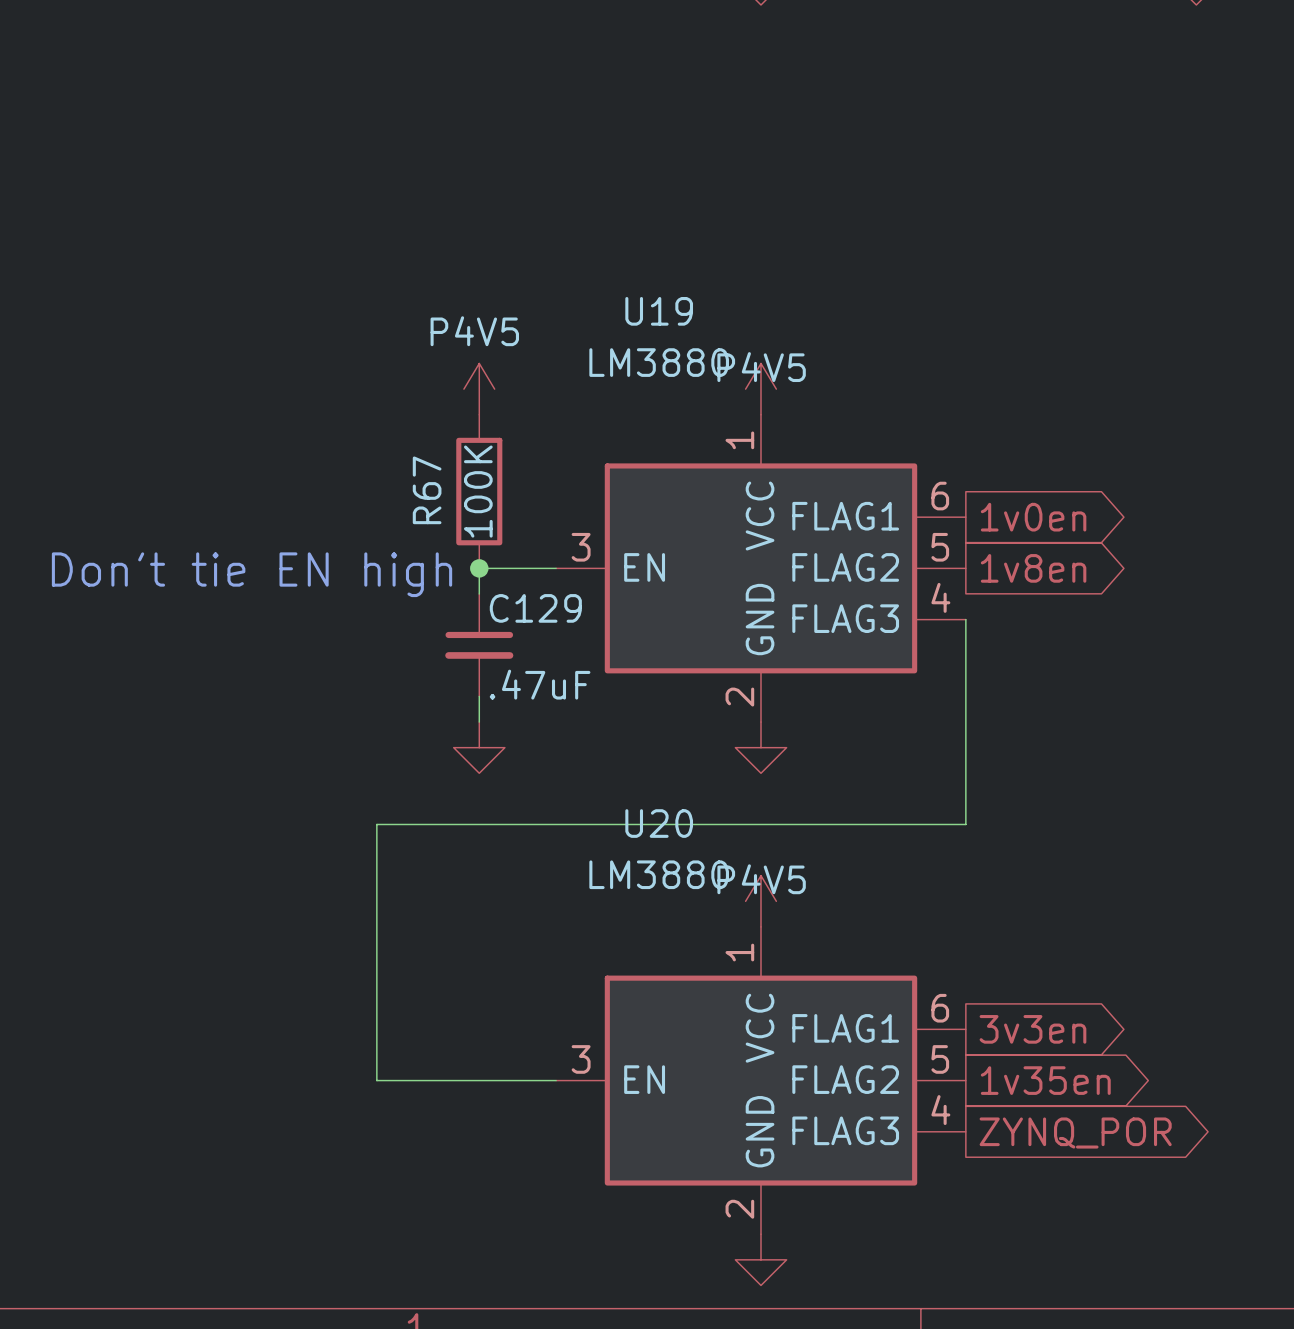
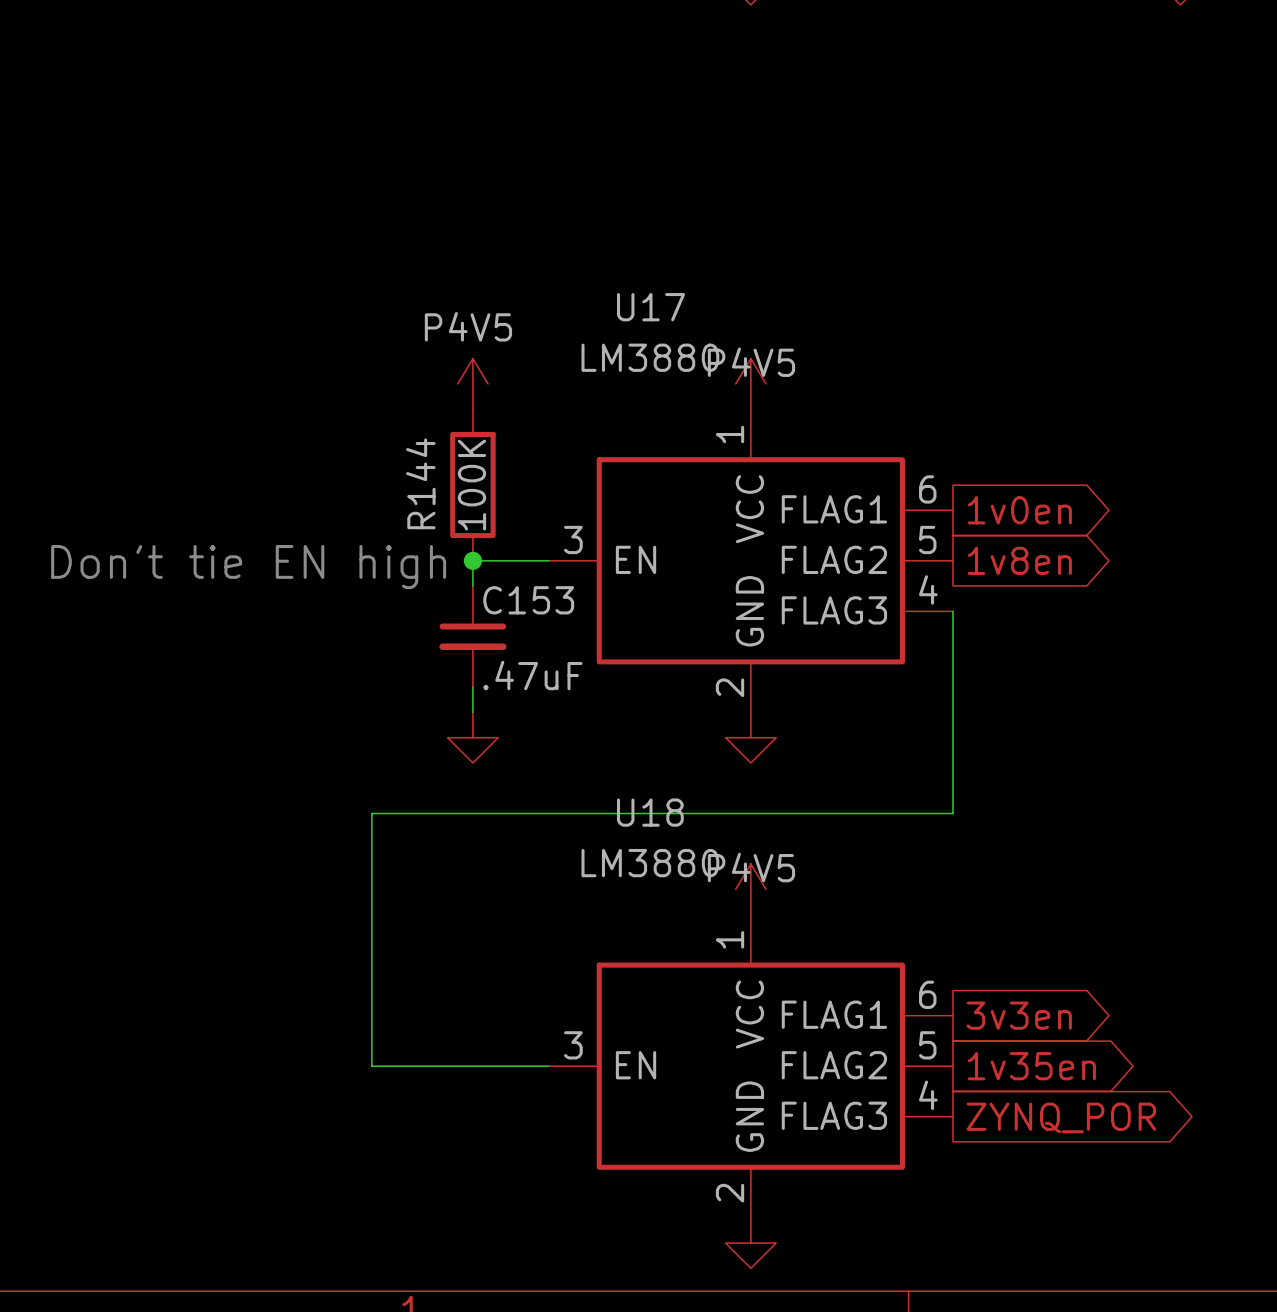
U19 name: U19 (659, 311) -> U17 (650, 307)
R67 name: R67 (427, 490) -> R144 (420, 483)
C129 name: C129 (535, 608) -> C153 (528, 600)
U20 name: U20 (659, 823) -> U18 (650, 812)

